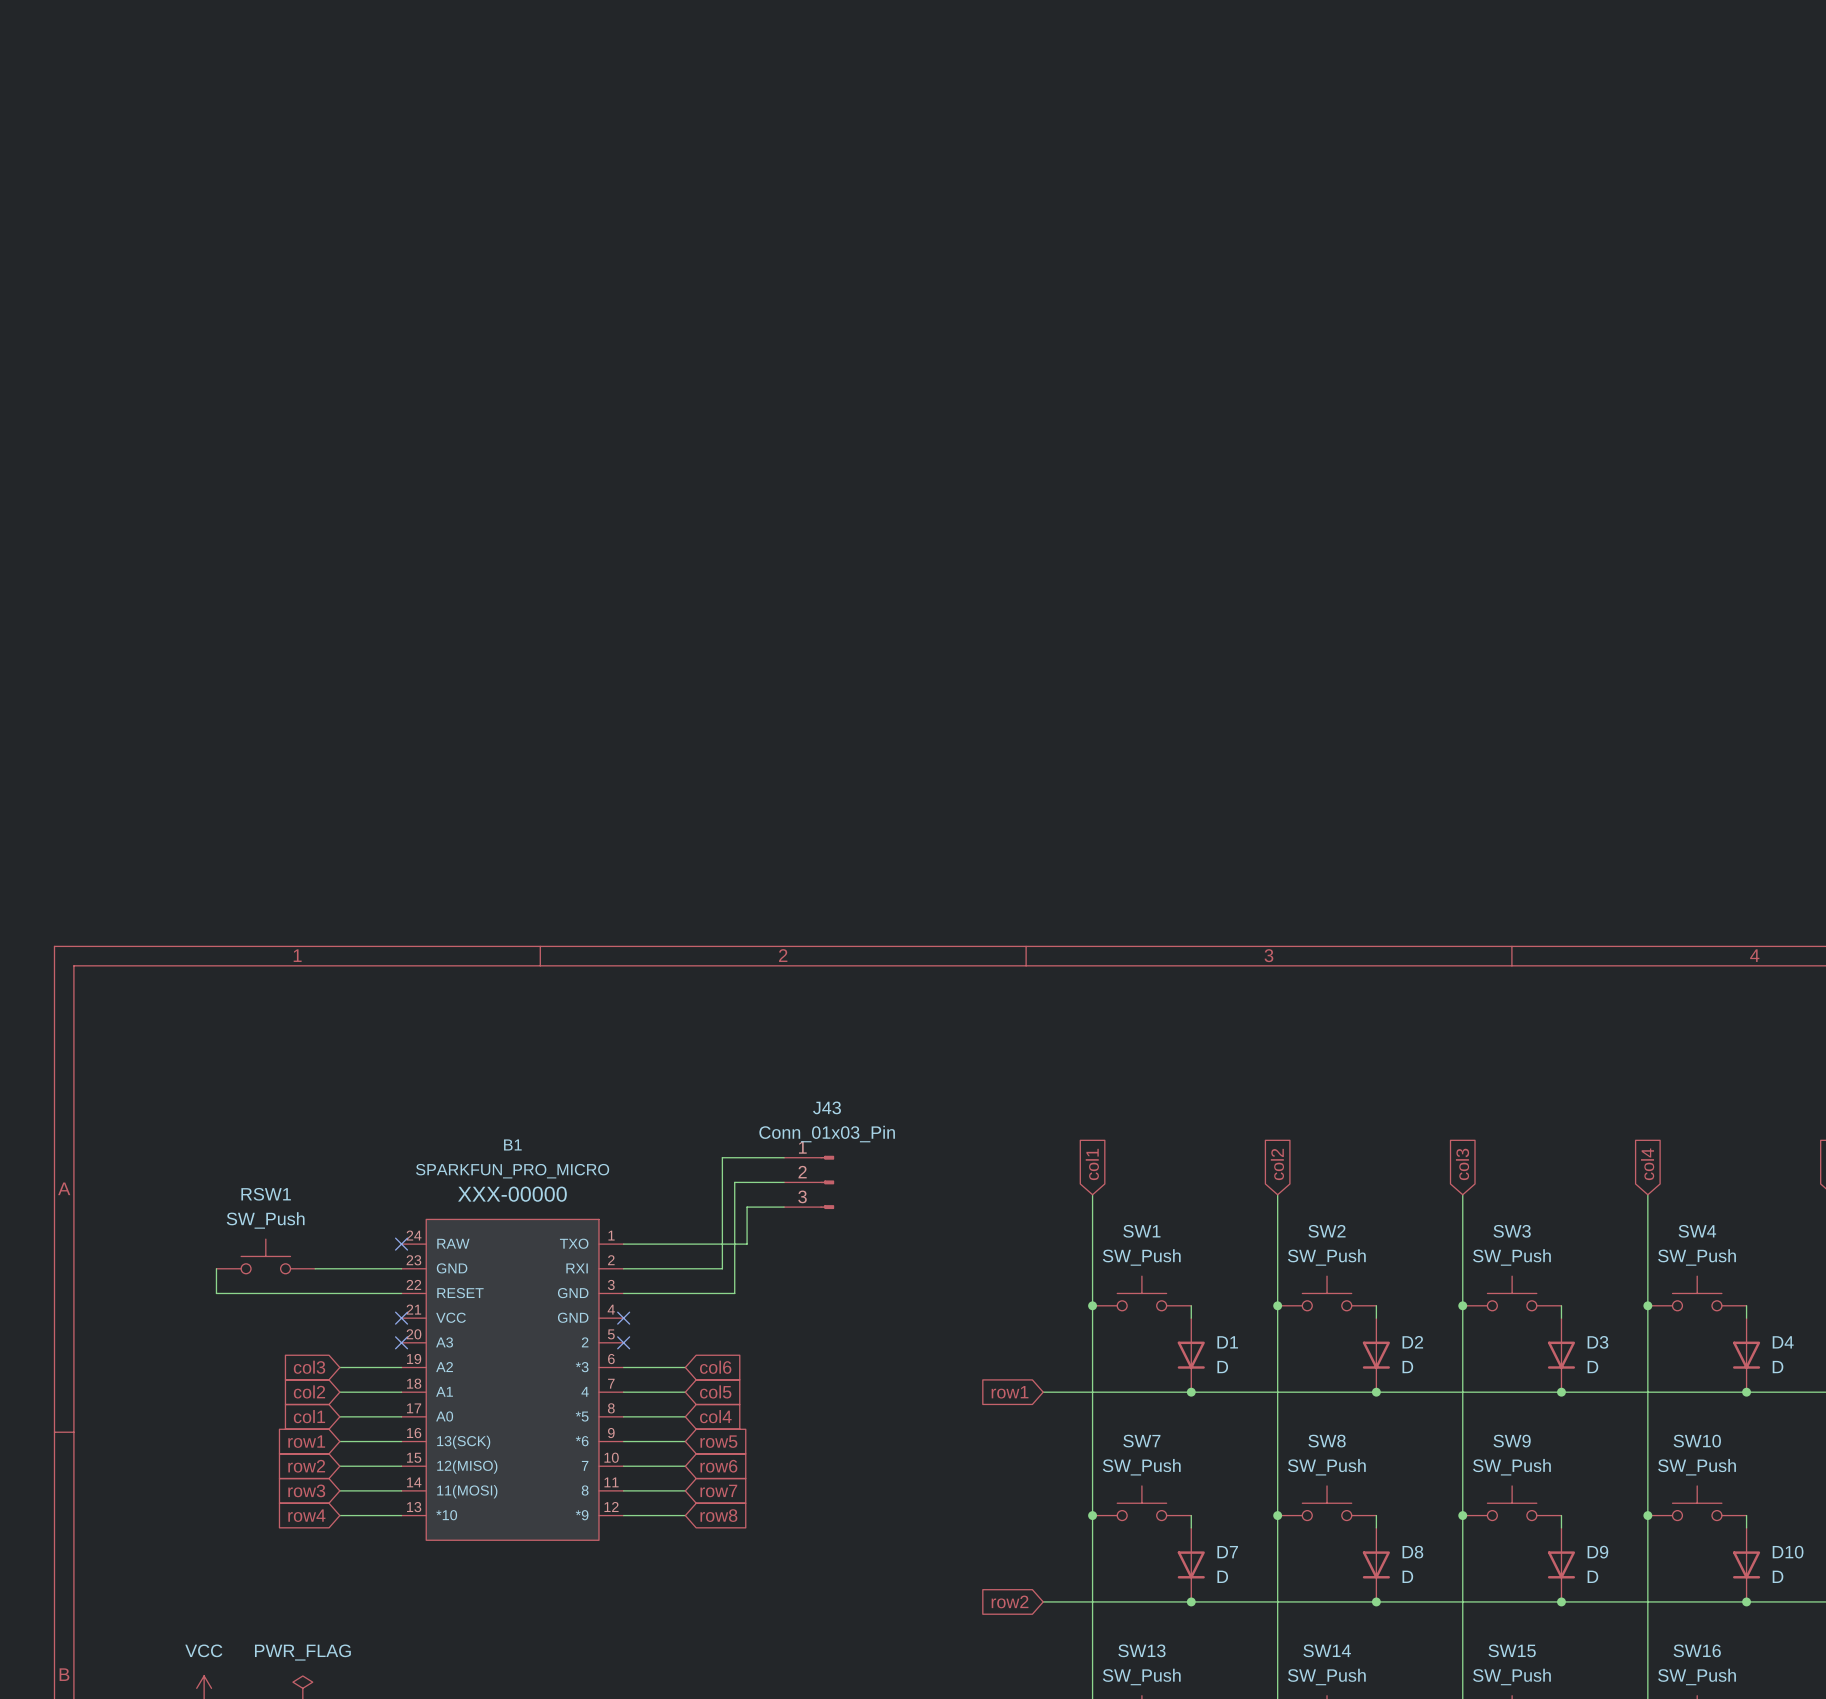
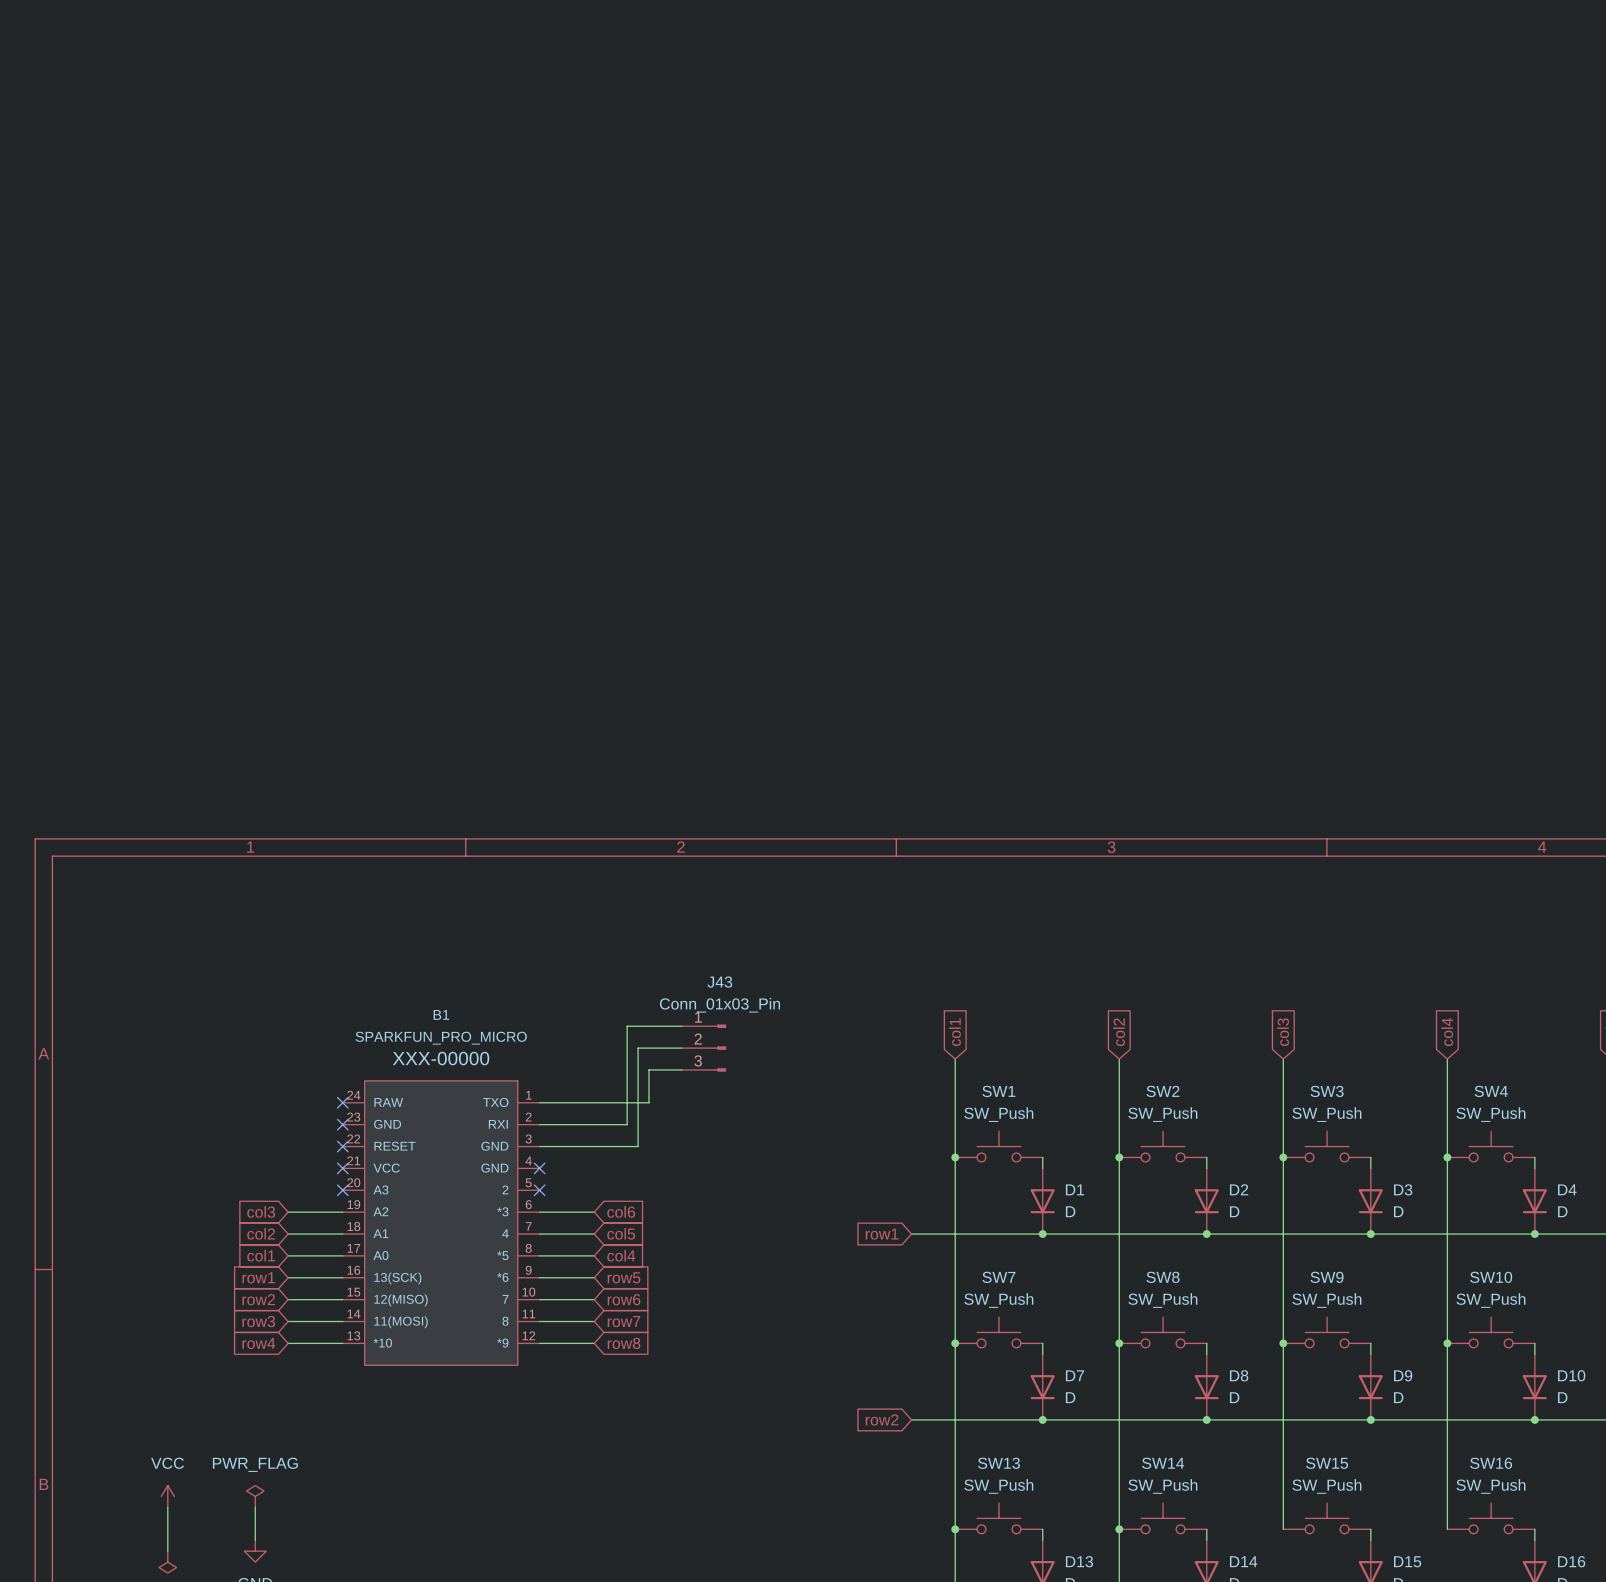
RSW1: SW_Push (265, 1256) -> none
wire: (216, 1268) (216, 1293) (401, 1293) -> none
wire: (315, 1268) (401, 1268) -> none
no-connect mark: none -> (342, 1124)
no-connect mark: none -> (342, 1146)

